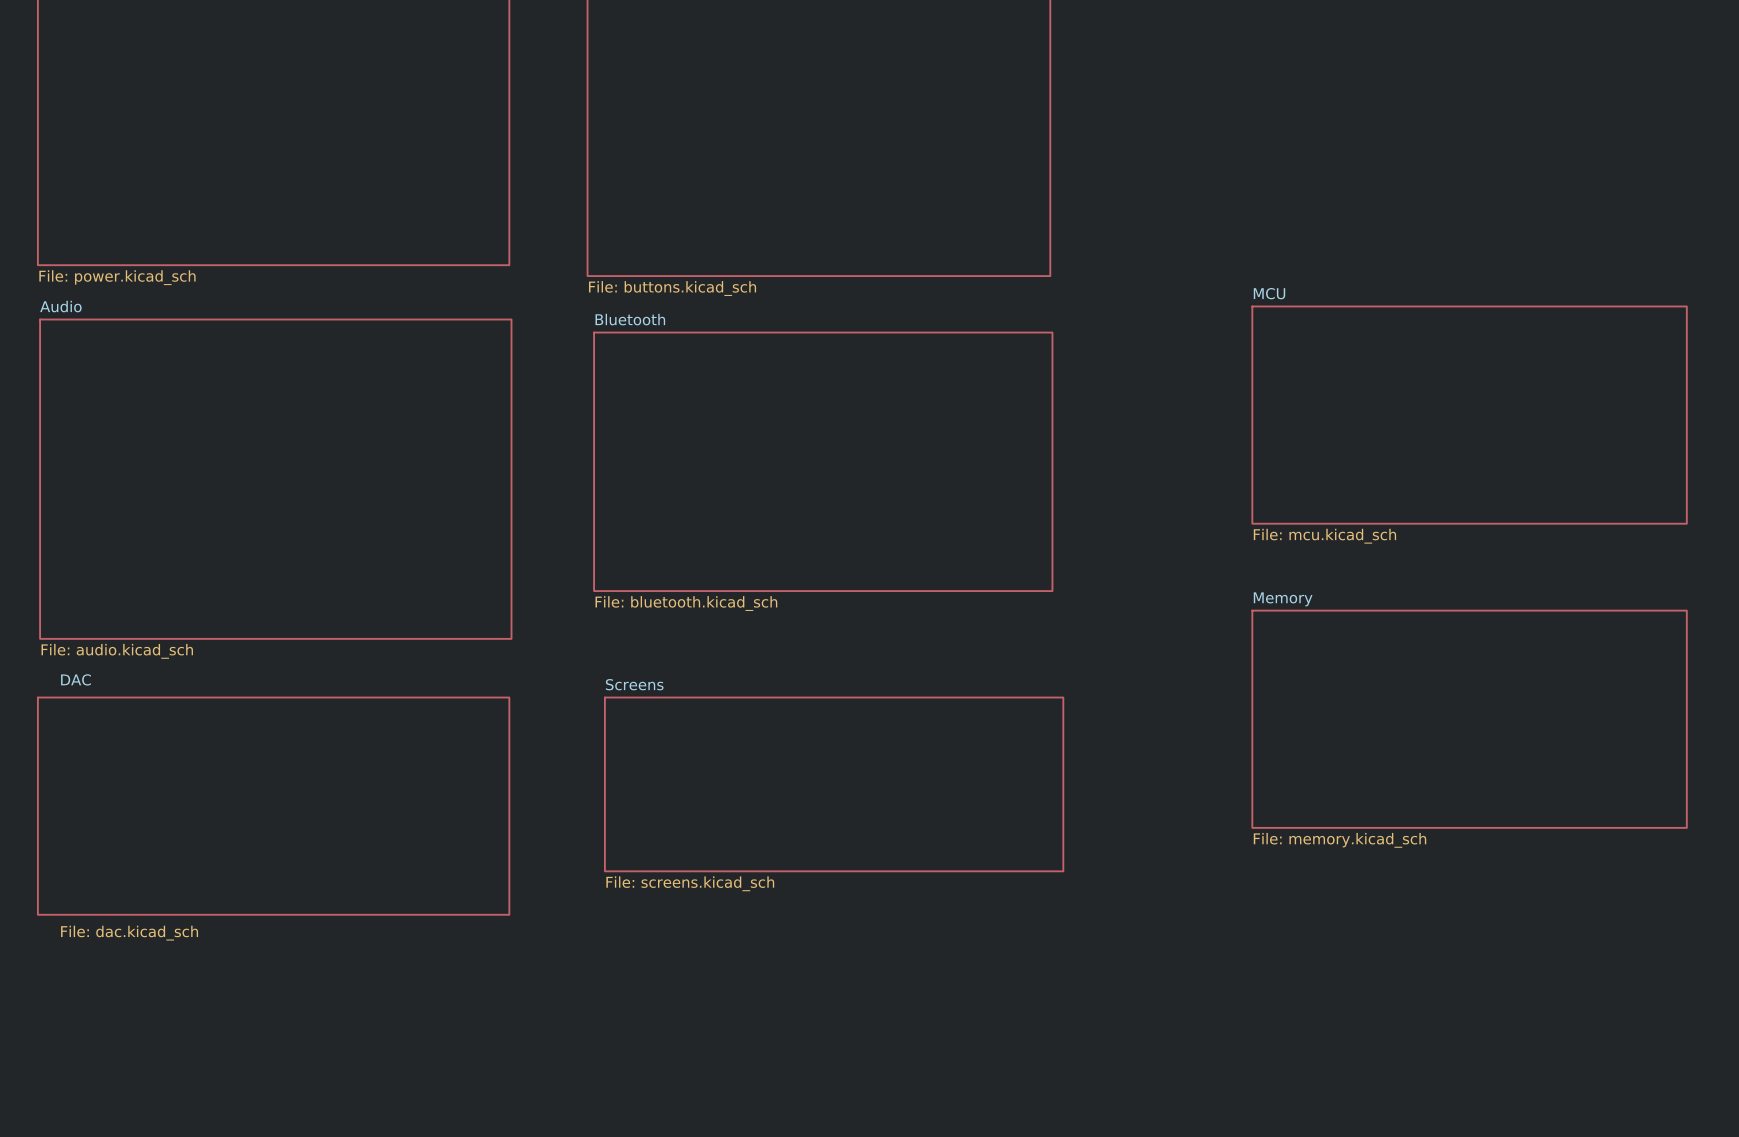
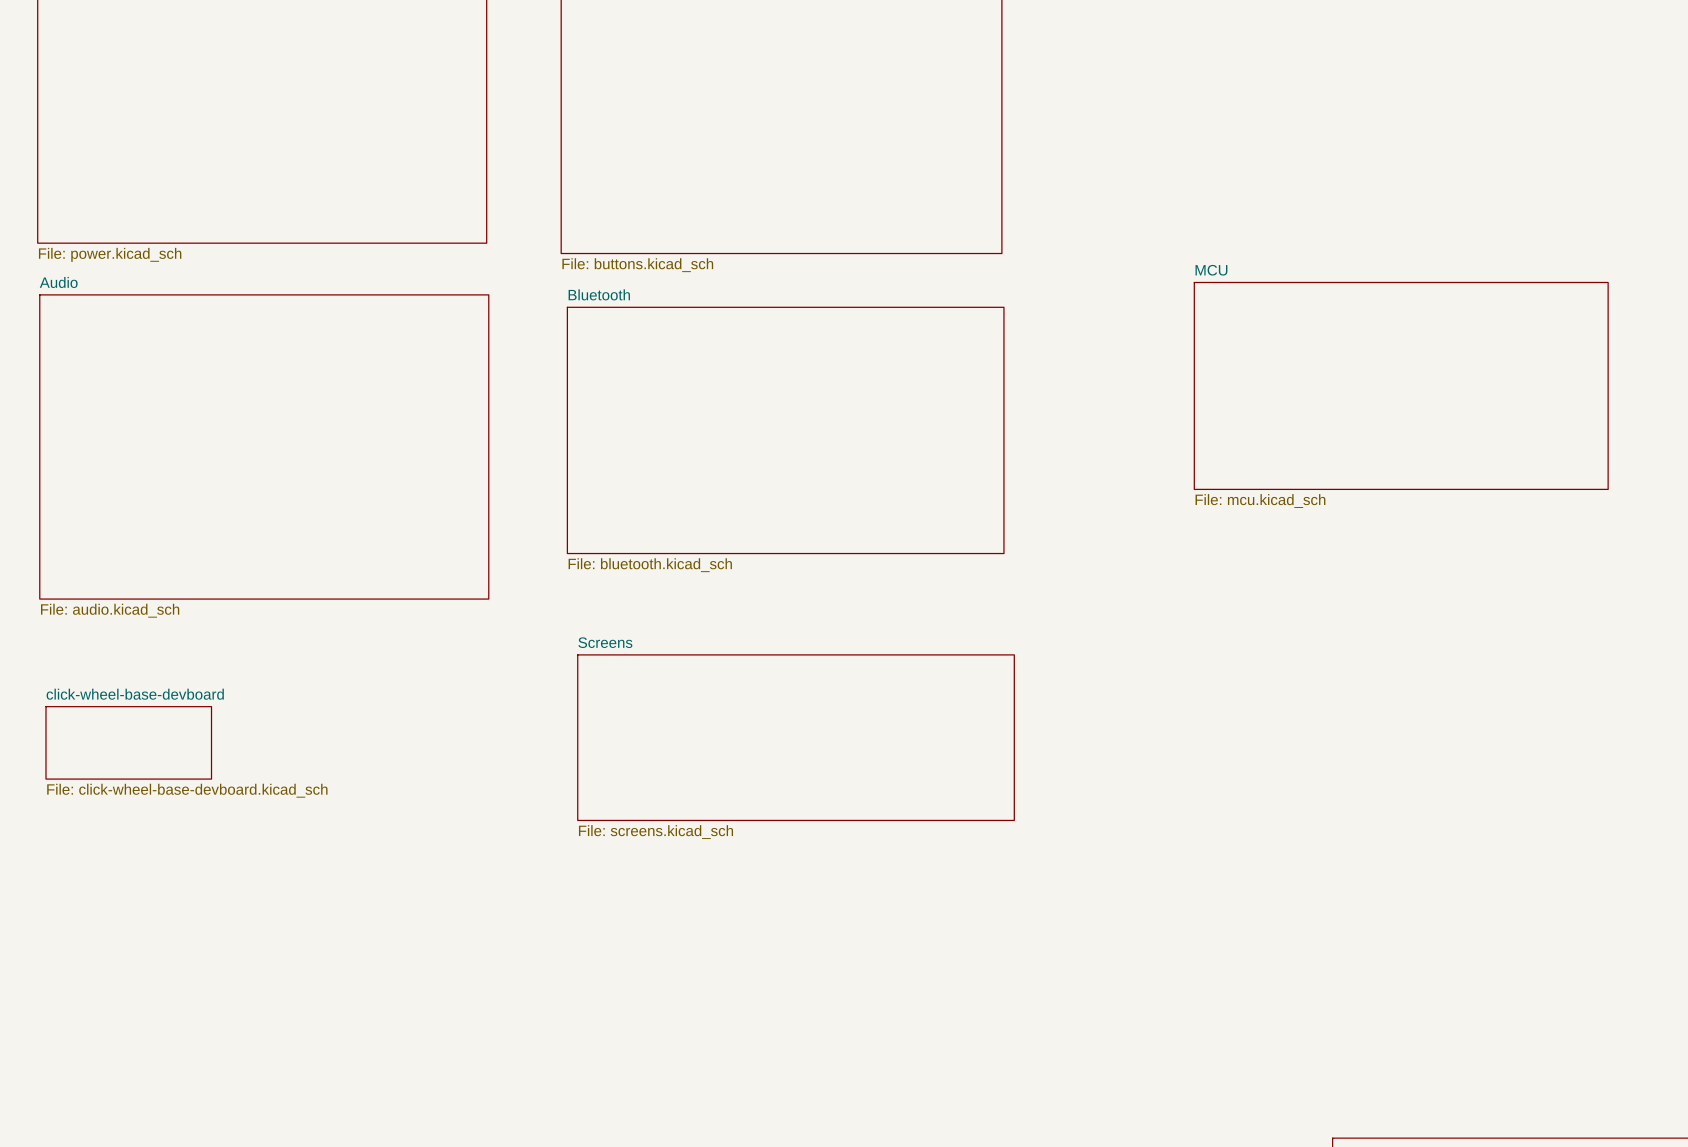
sheet Memory: File: memory.kicad_sch (1469, 719) -> none
sheet click-wheel-base-devboard: none -> File: click-wheel-base-devboard.kicad_sch (128, 742)
sheet DAC: File: dac.kicad_sch (273, 806) -> none

